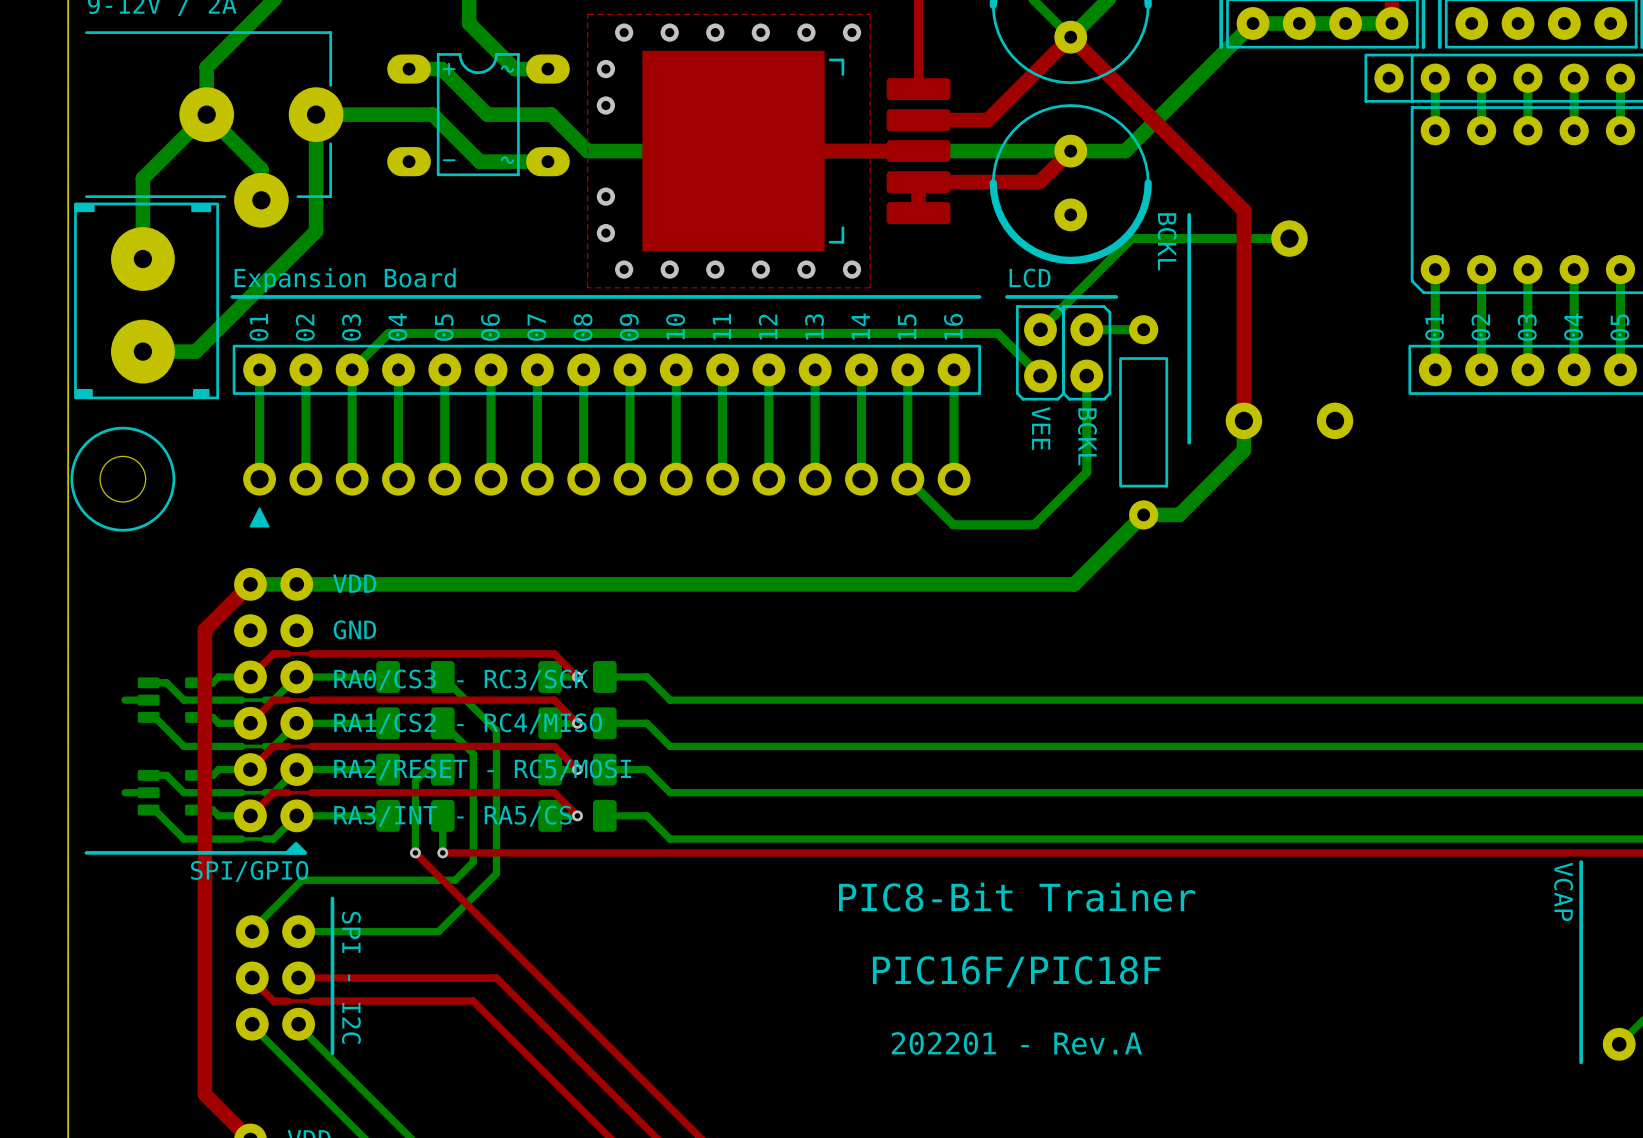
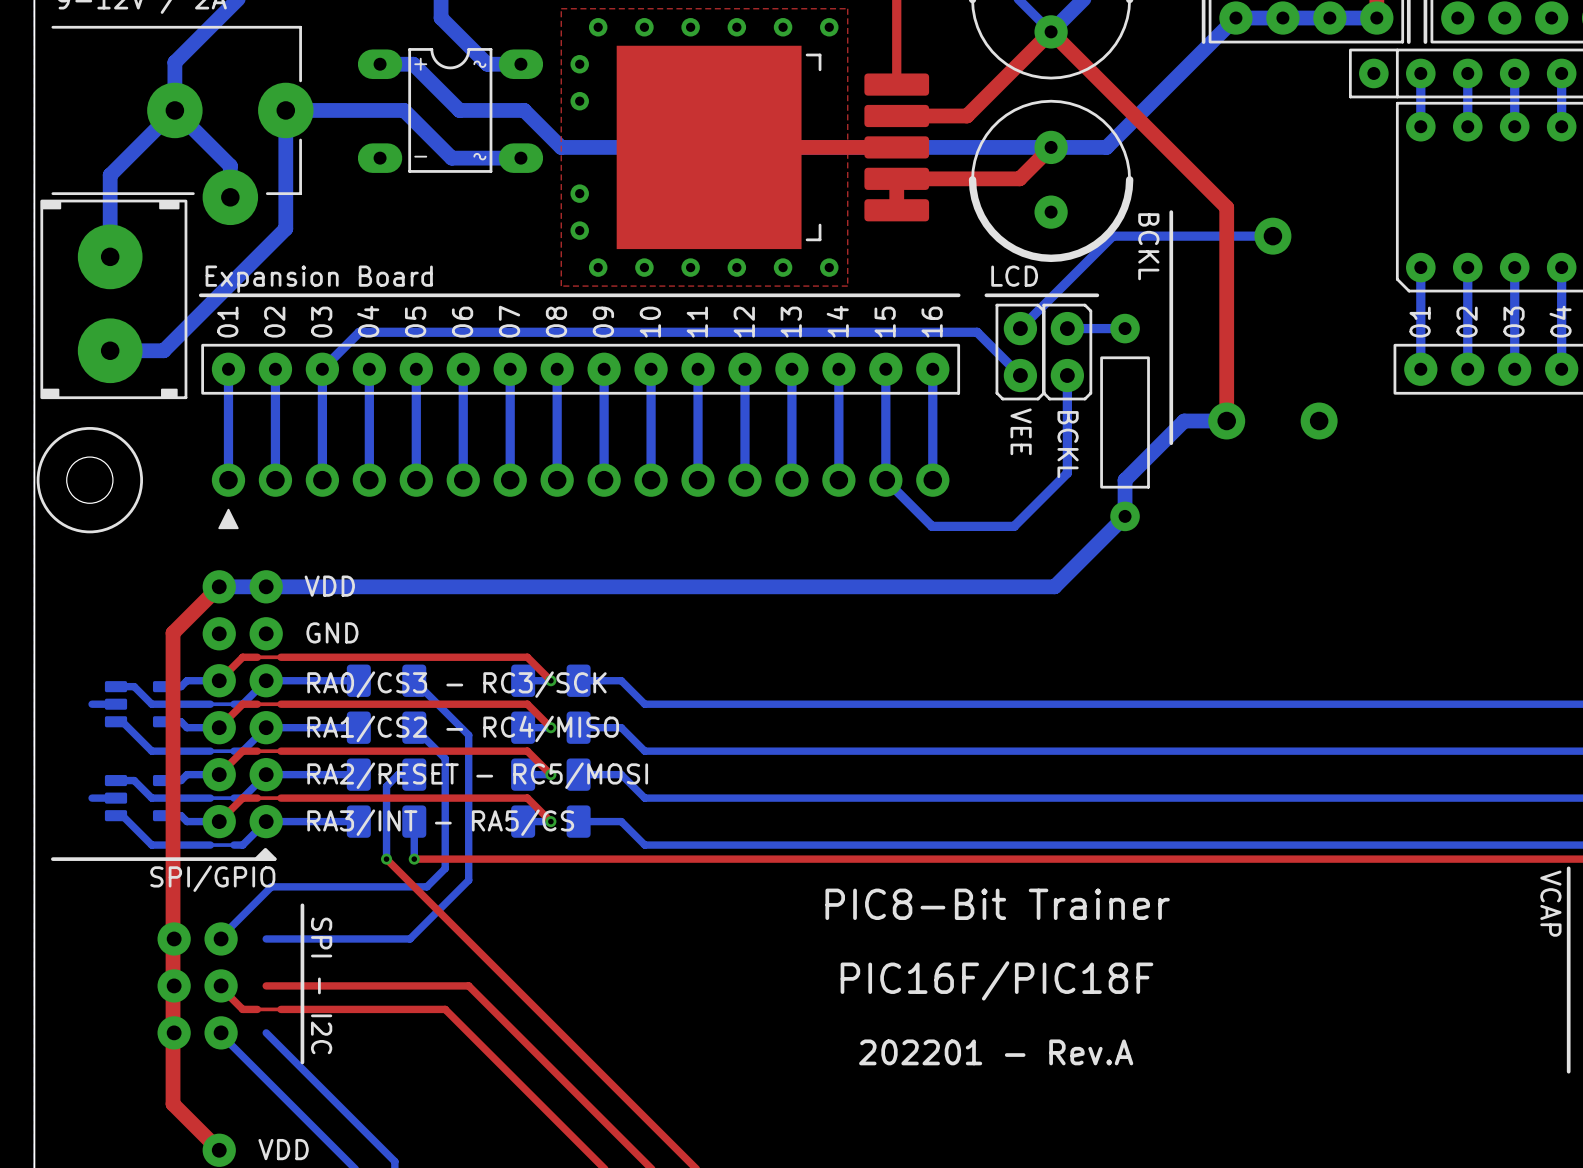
bottom track: (1243, 420) (1243, 450) (1179, 514) (1143, 514) -> (1226, 421) (1184, 421) (1125, 480) (1125, 516)
part position: (275, 977) -> (197, 985)

